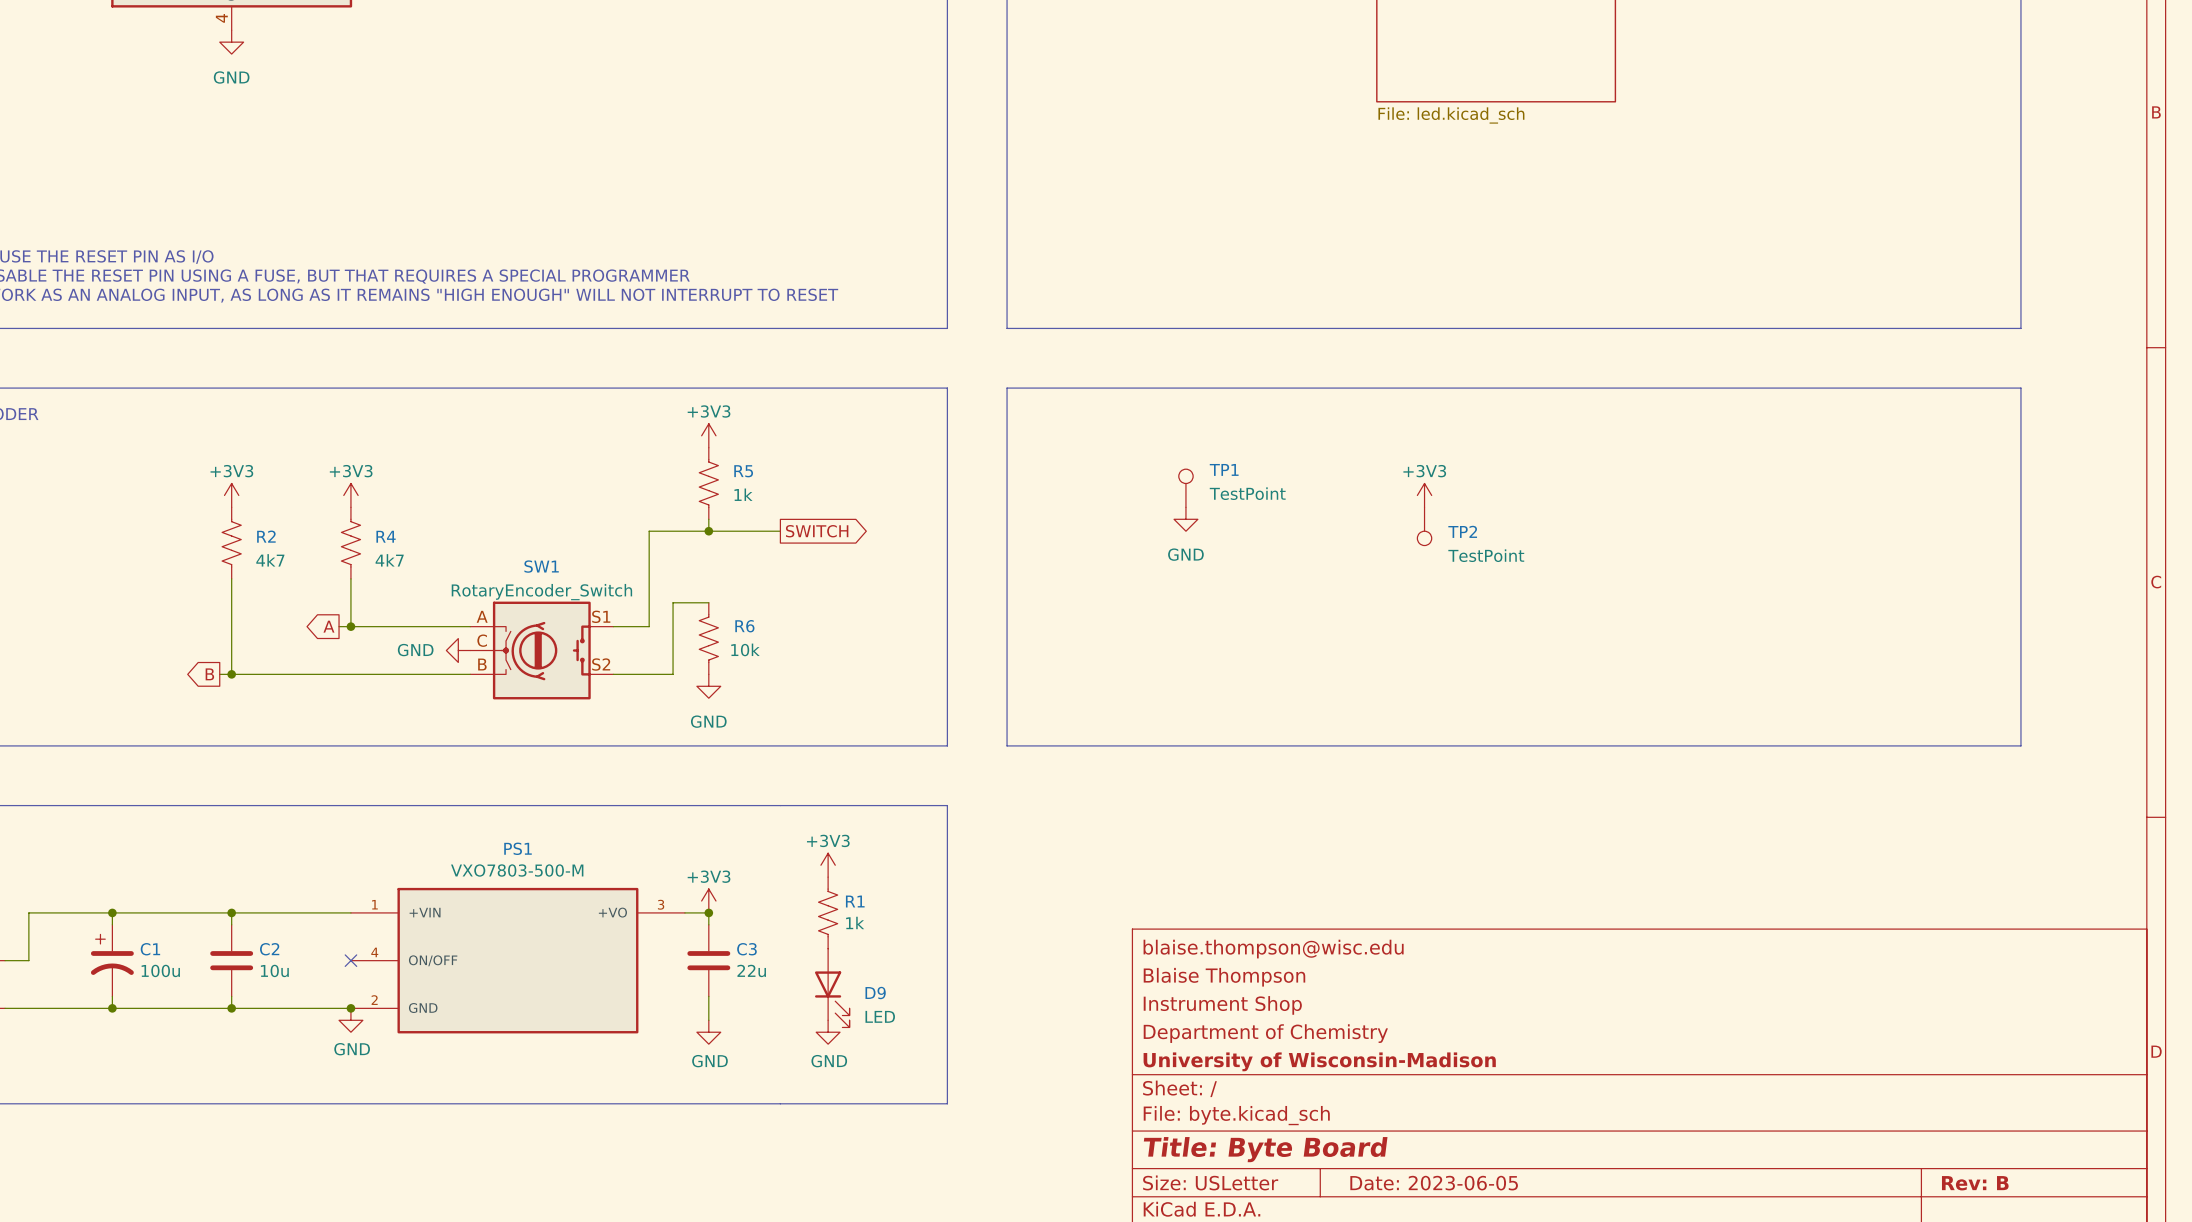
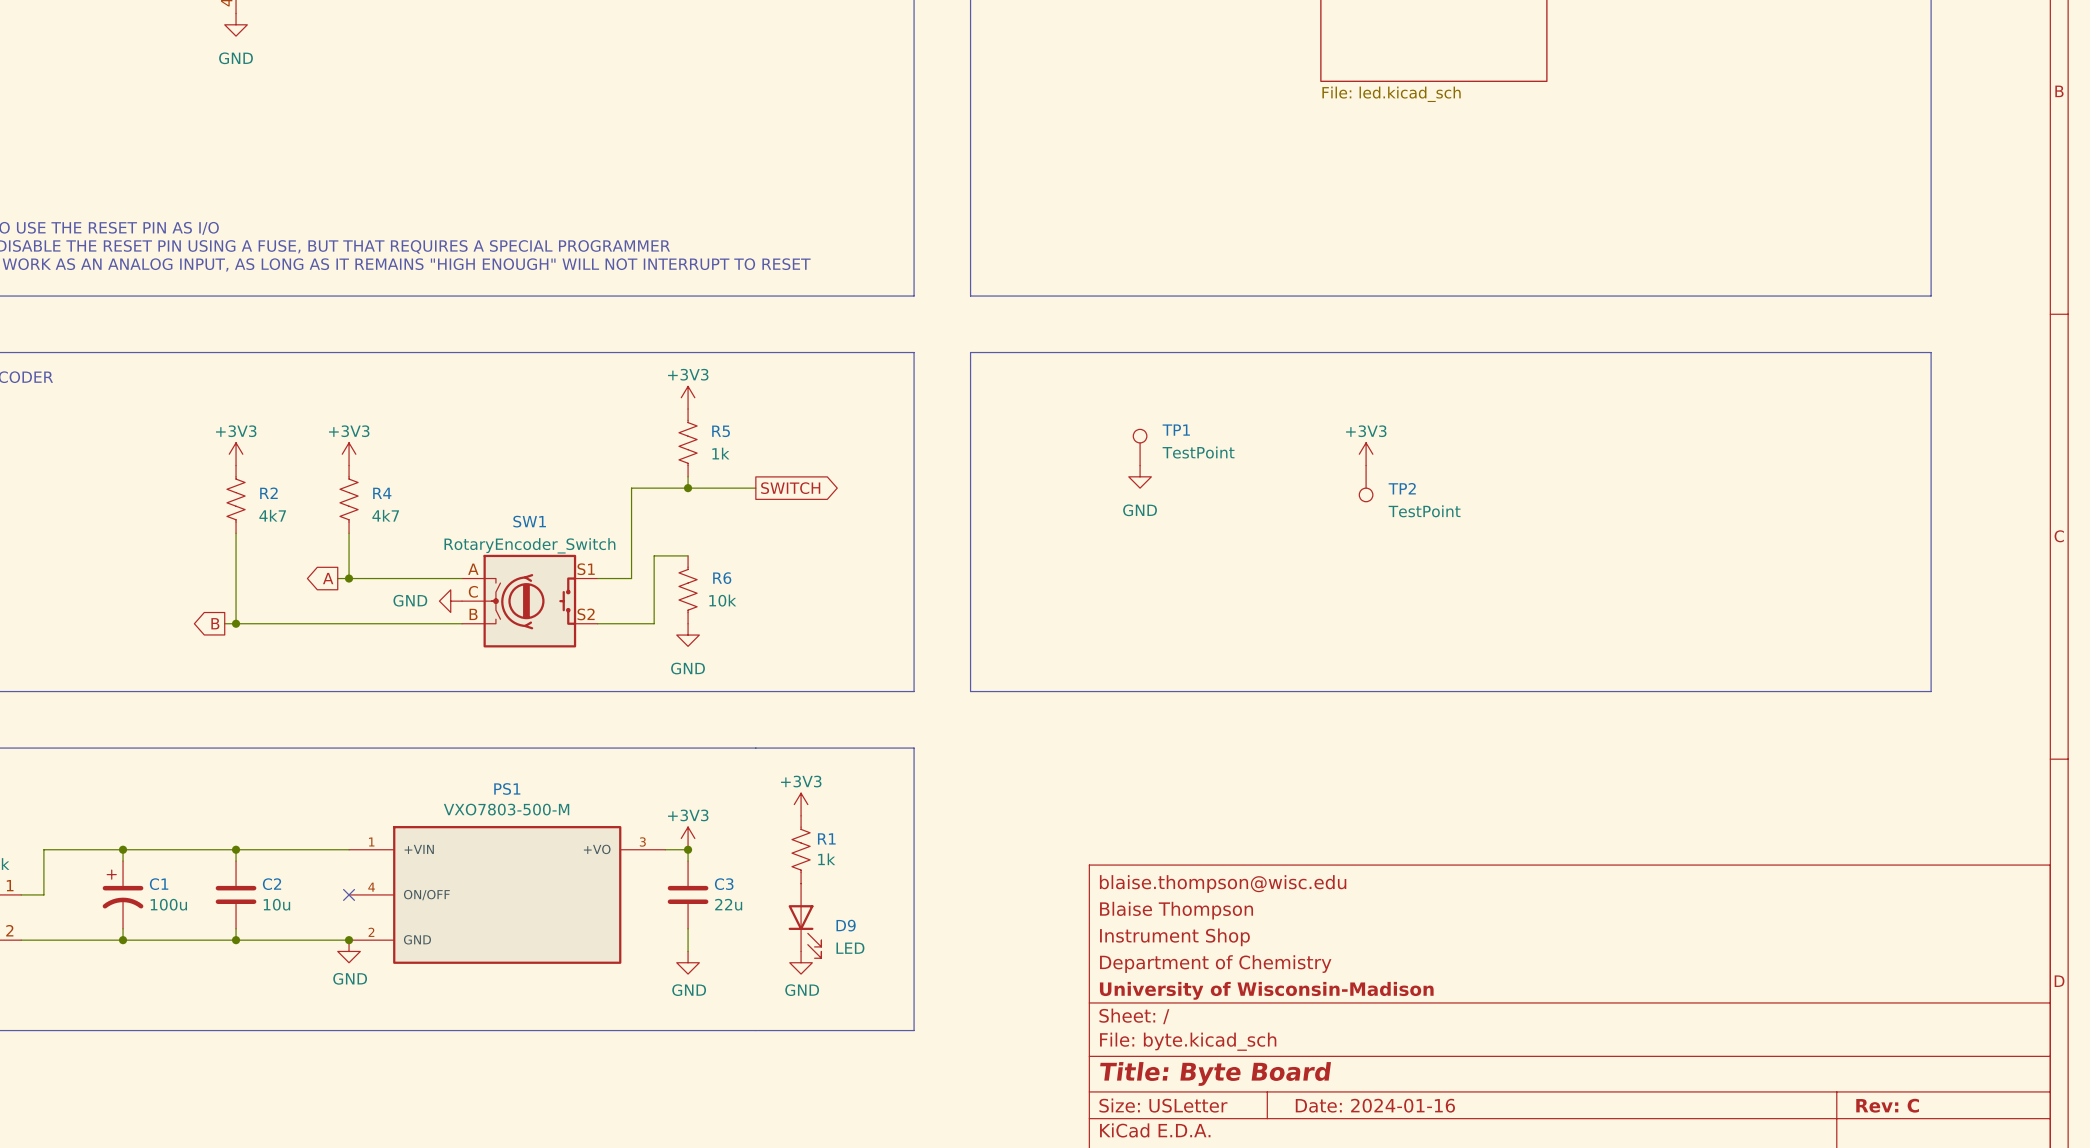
title block: Date: 2023-06-05 (1434, 1183) -> Date: 2024-01-16 (1375, 1105)
title block: Rev: B (1975, 1183) -> Rev: C (1887, 1105)

